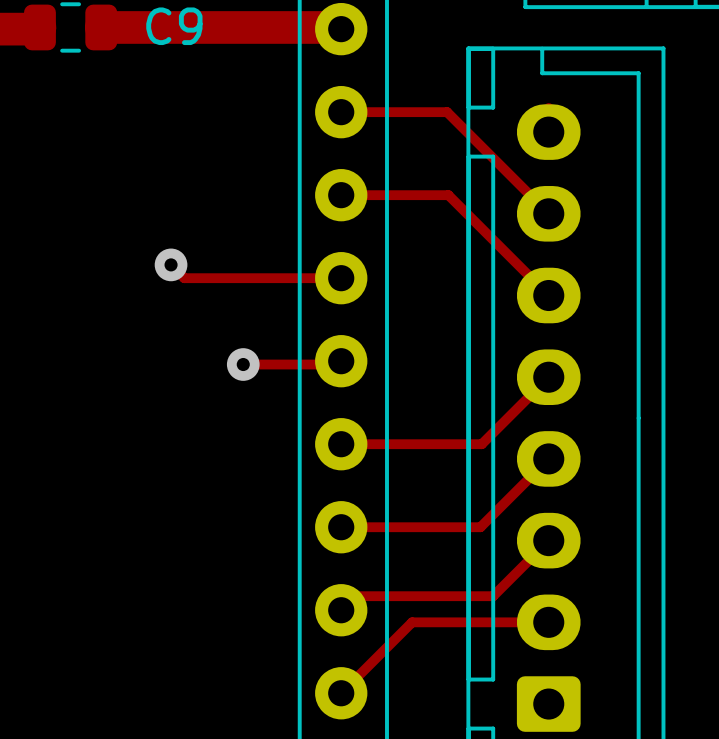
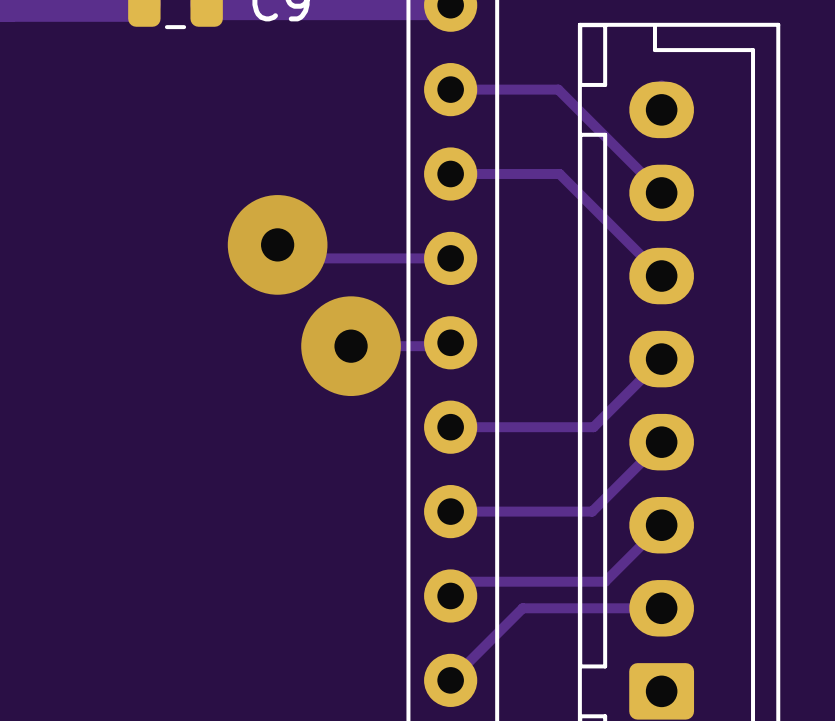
via size: [154, 248, 188, 282] -> [227, 195, 328, 295]
via size: [226, 348, 260, 381] -> [301, 296, 401, 397]

